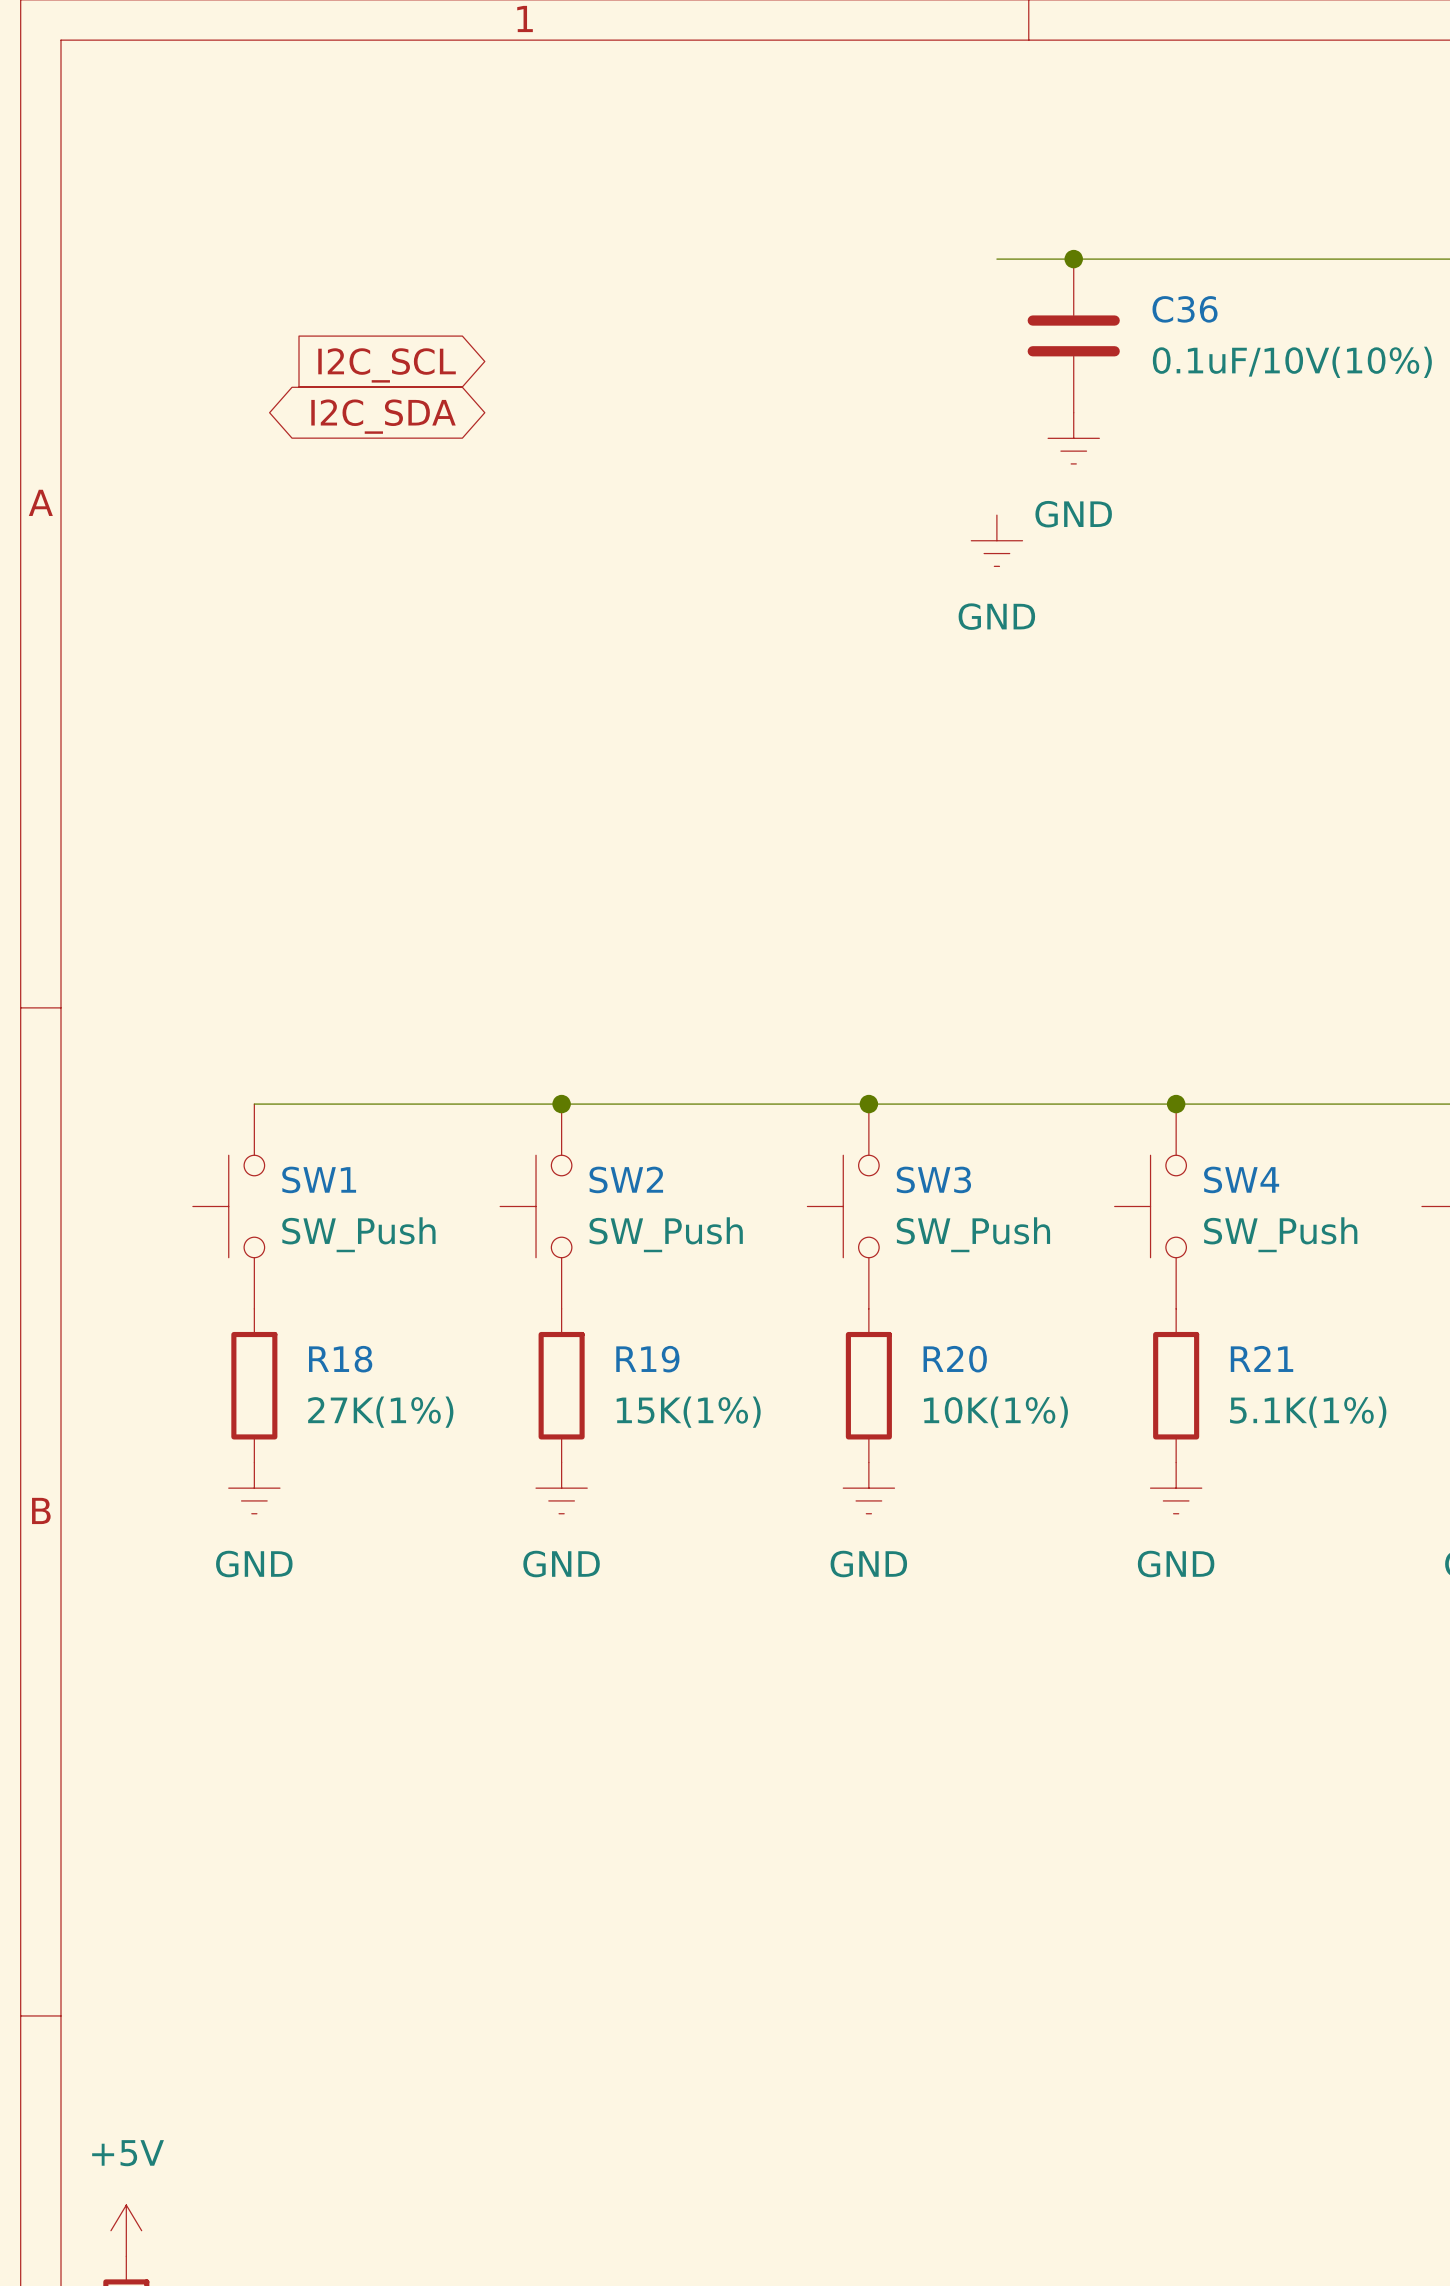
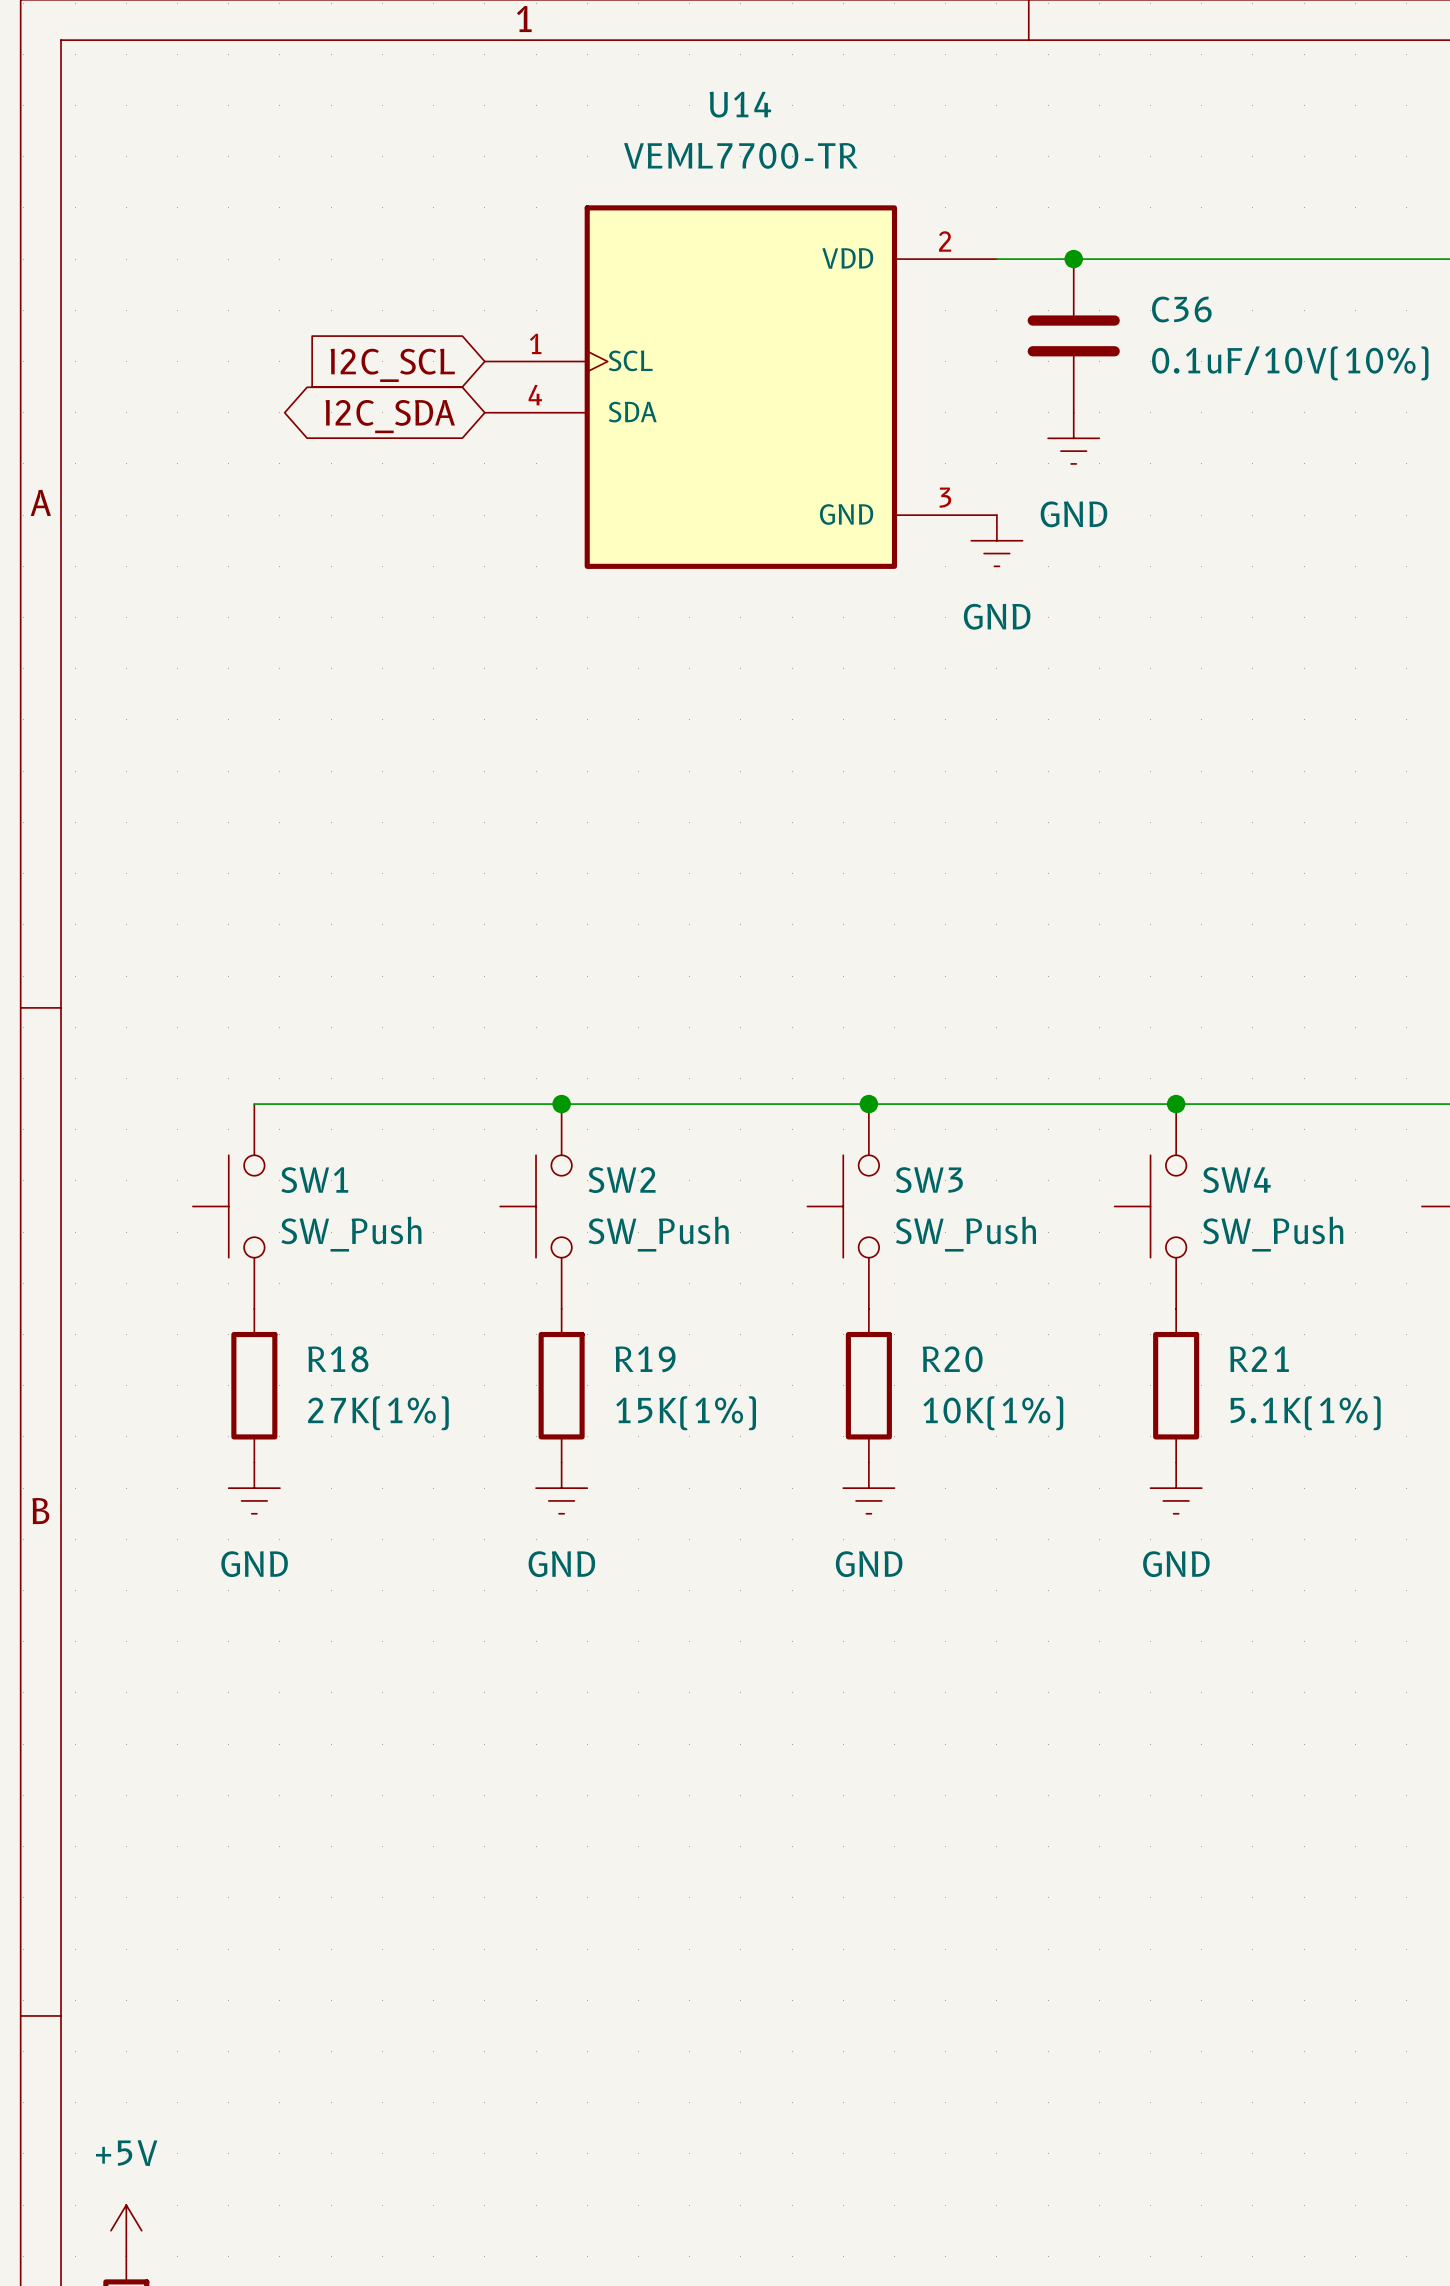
U14: none -> VEML7700-TR (740, 387)

